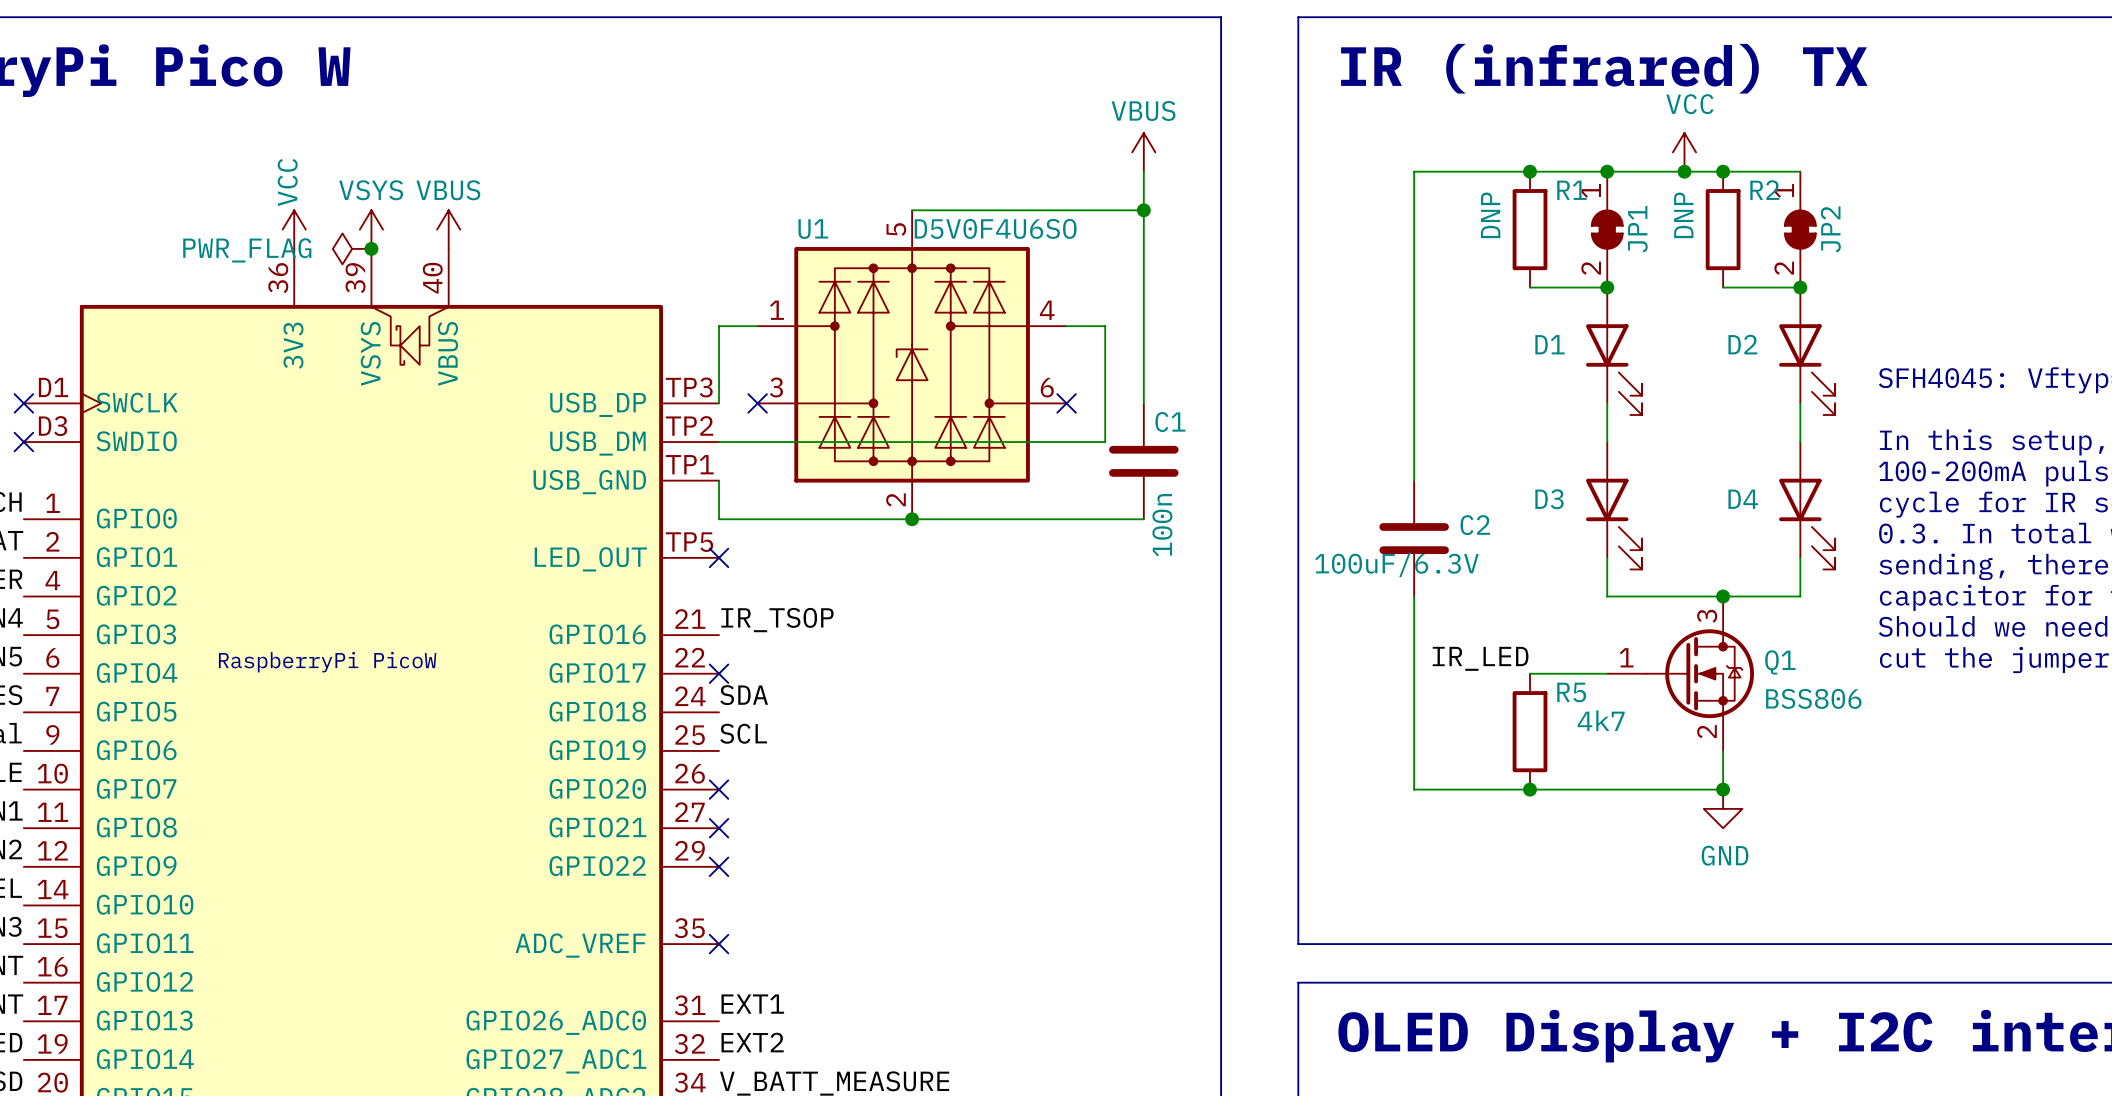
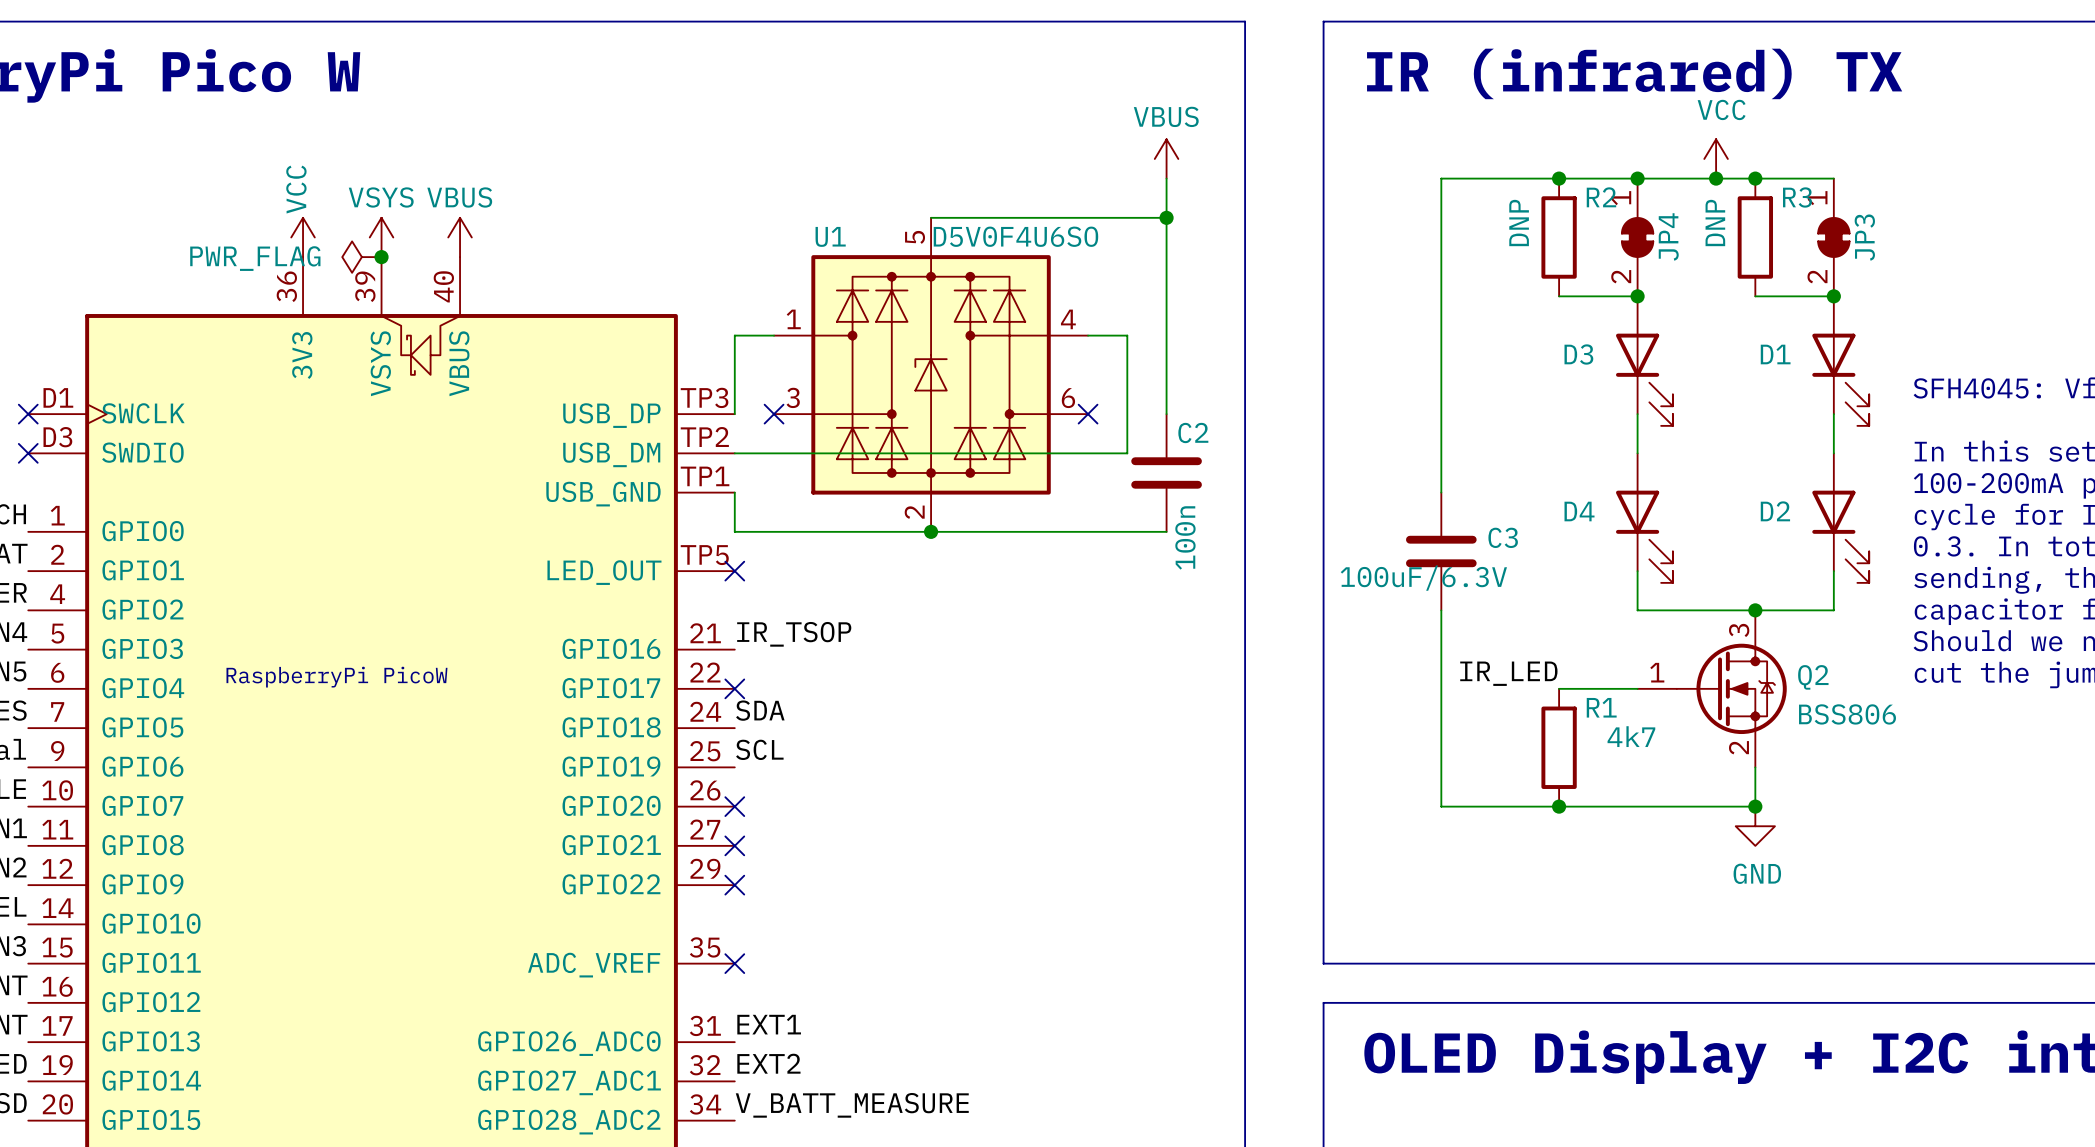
R1 name: R1 (1571, 190) -> R2 (1601, 197)
R2 name: R2 (1764, 190) -> R3 (1797, 197)
JP1 name: JP1 (1637, 229) -> JP4 (1668, 236)
JP2 name: JP2 (1830, 229) -> JP3 (1864, 237)
D1 name: D1 (1549, 344) -> D3 (1578, 354)
D2 name: D2 (1742, 344) -> D1 (1775, 354)
C1 name: C1 (1170, 421) -> C2 (1193, 433)
D3 name: D3 (1549, 499) -> D4 (1579, 511)
D4 name: D4 (1743, 499) -> D2 (1775, 511)
C2 name: C2 (1475, 525) -> C3 (1503, 537)
Q1 name: Q1 (1780, 662) -> Q2 (1813, 677)
R5 name: R5 (1571, 692) -> R1 (1601, 707)

